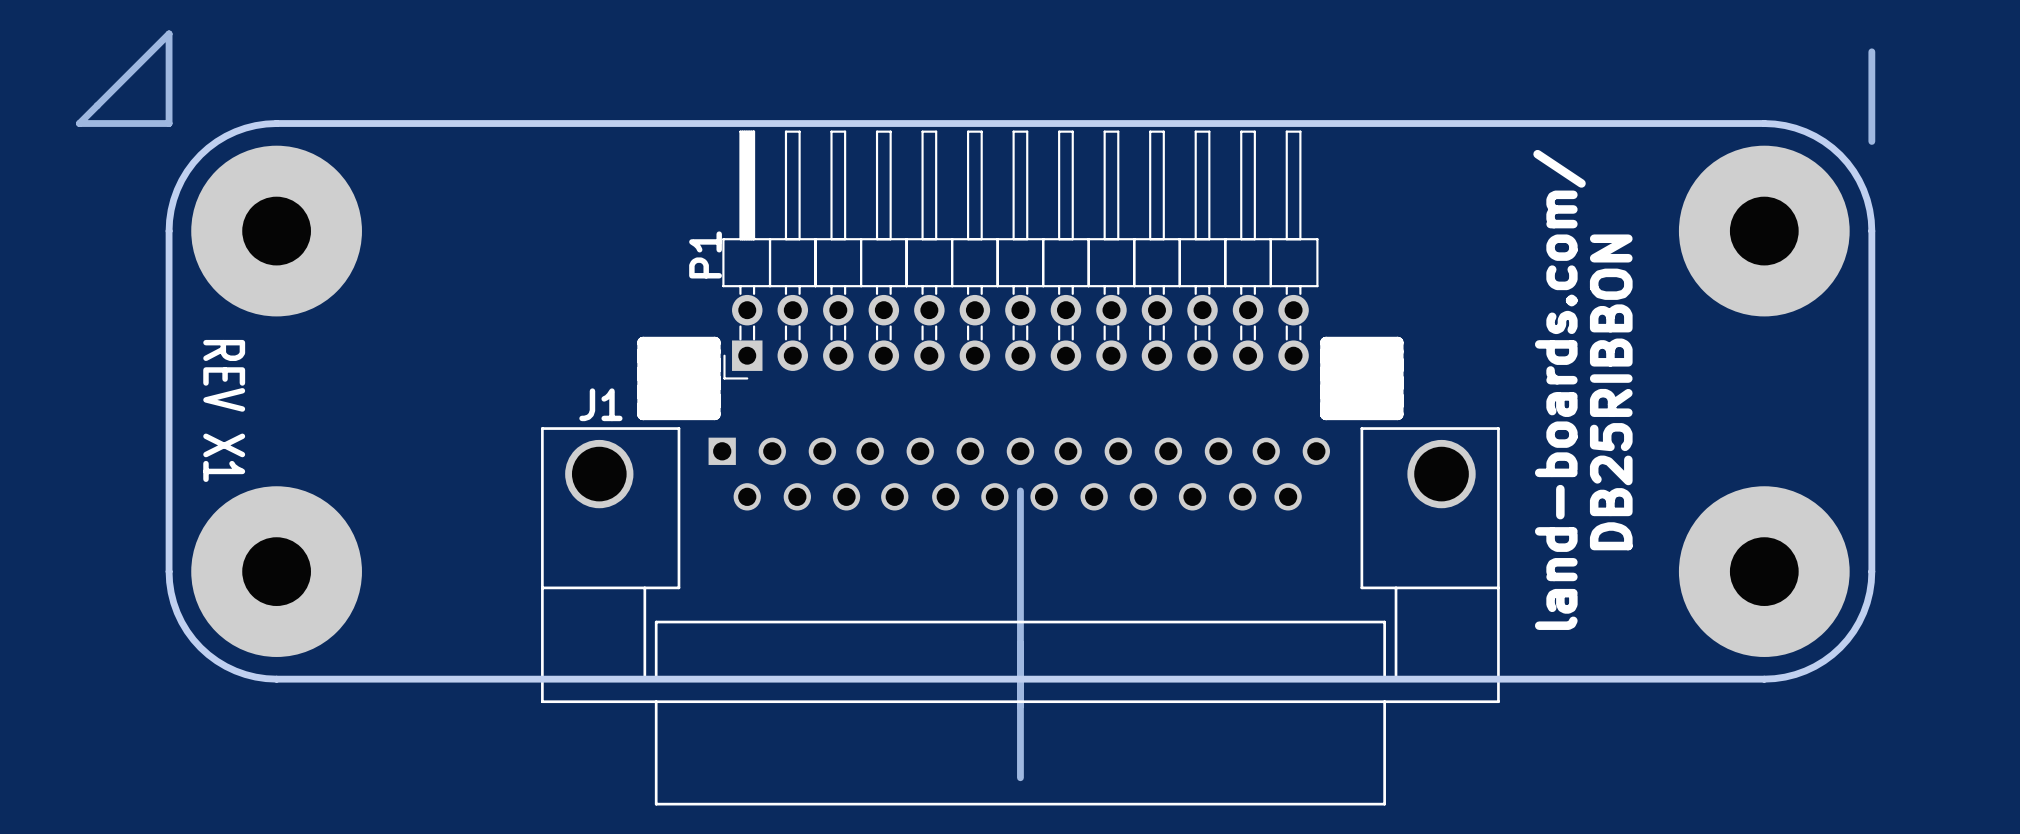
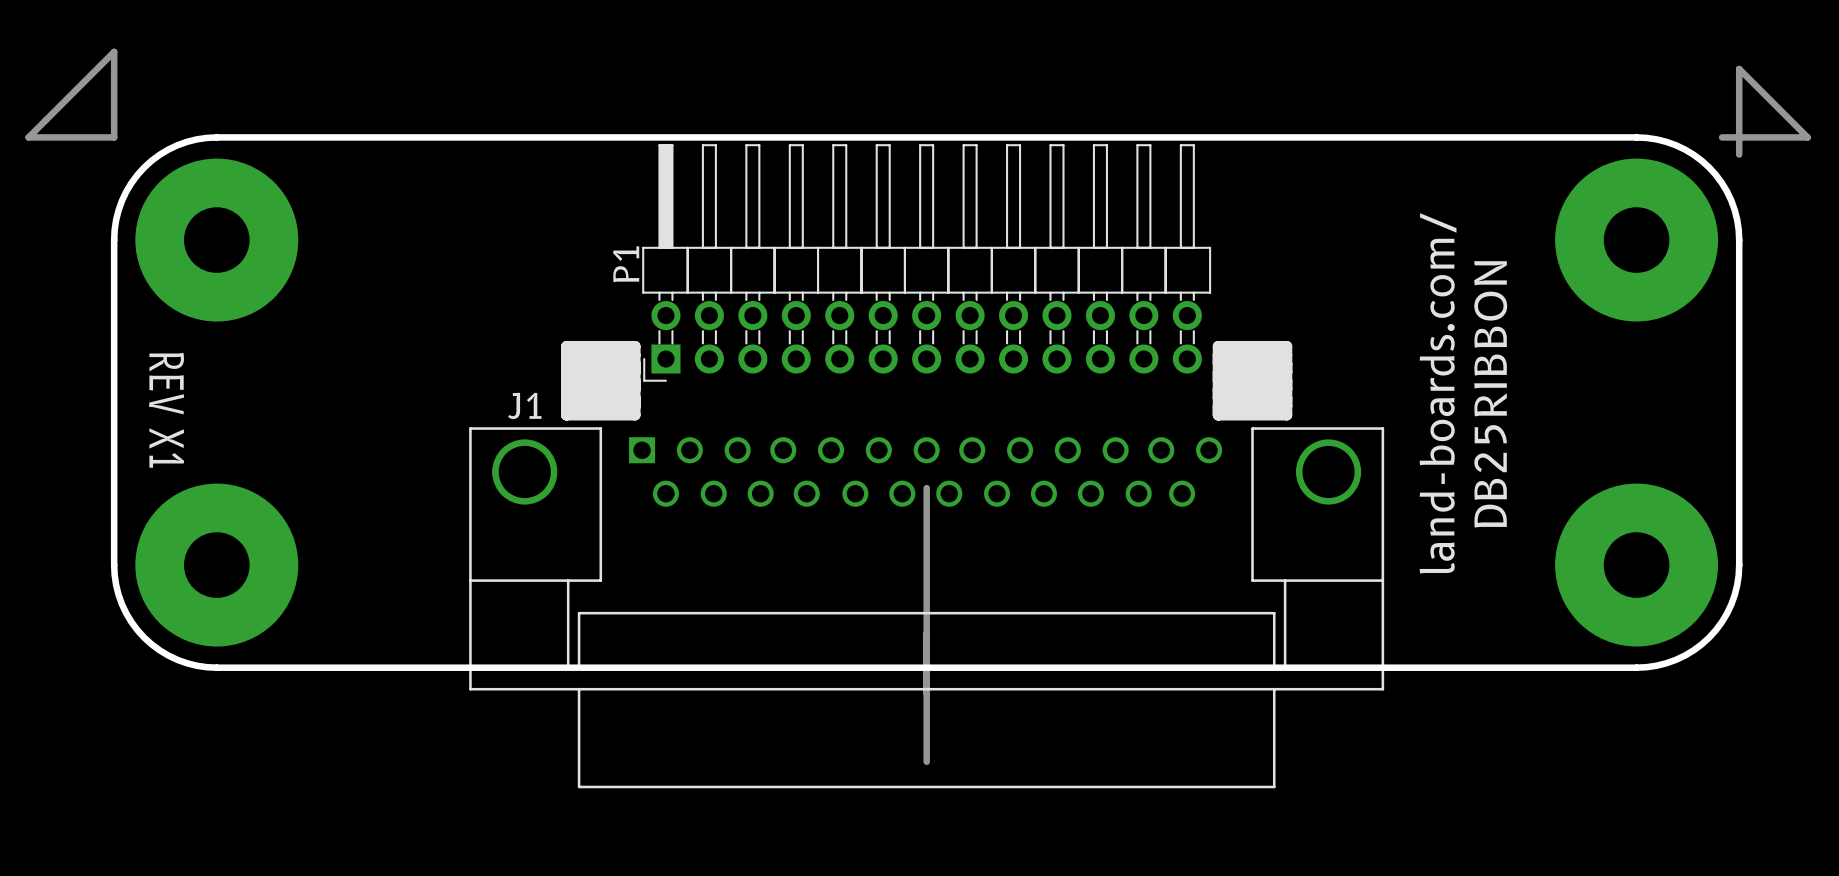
line: none -> (1739, 69) (1807, 137) (1722, 137)

